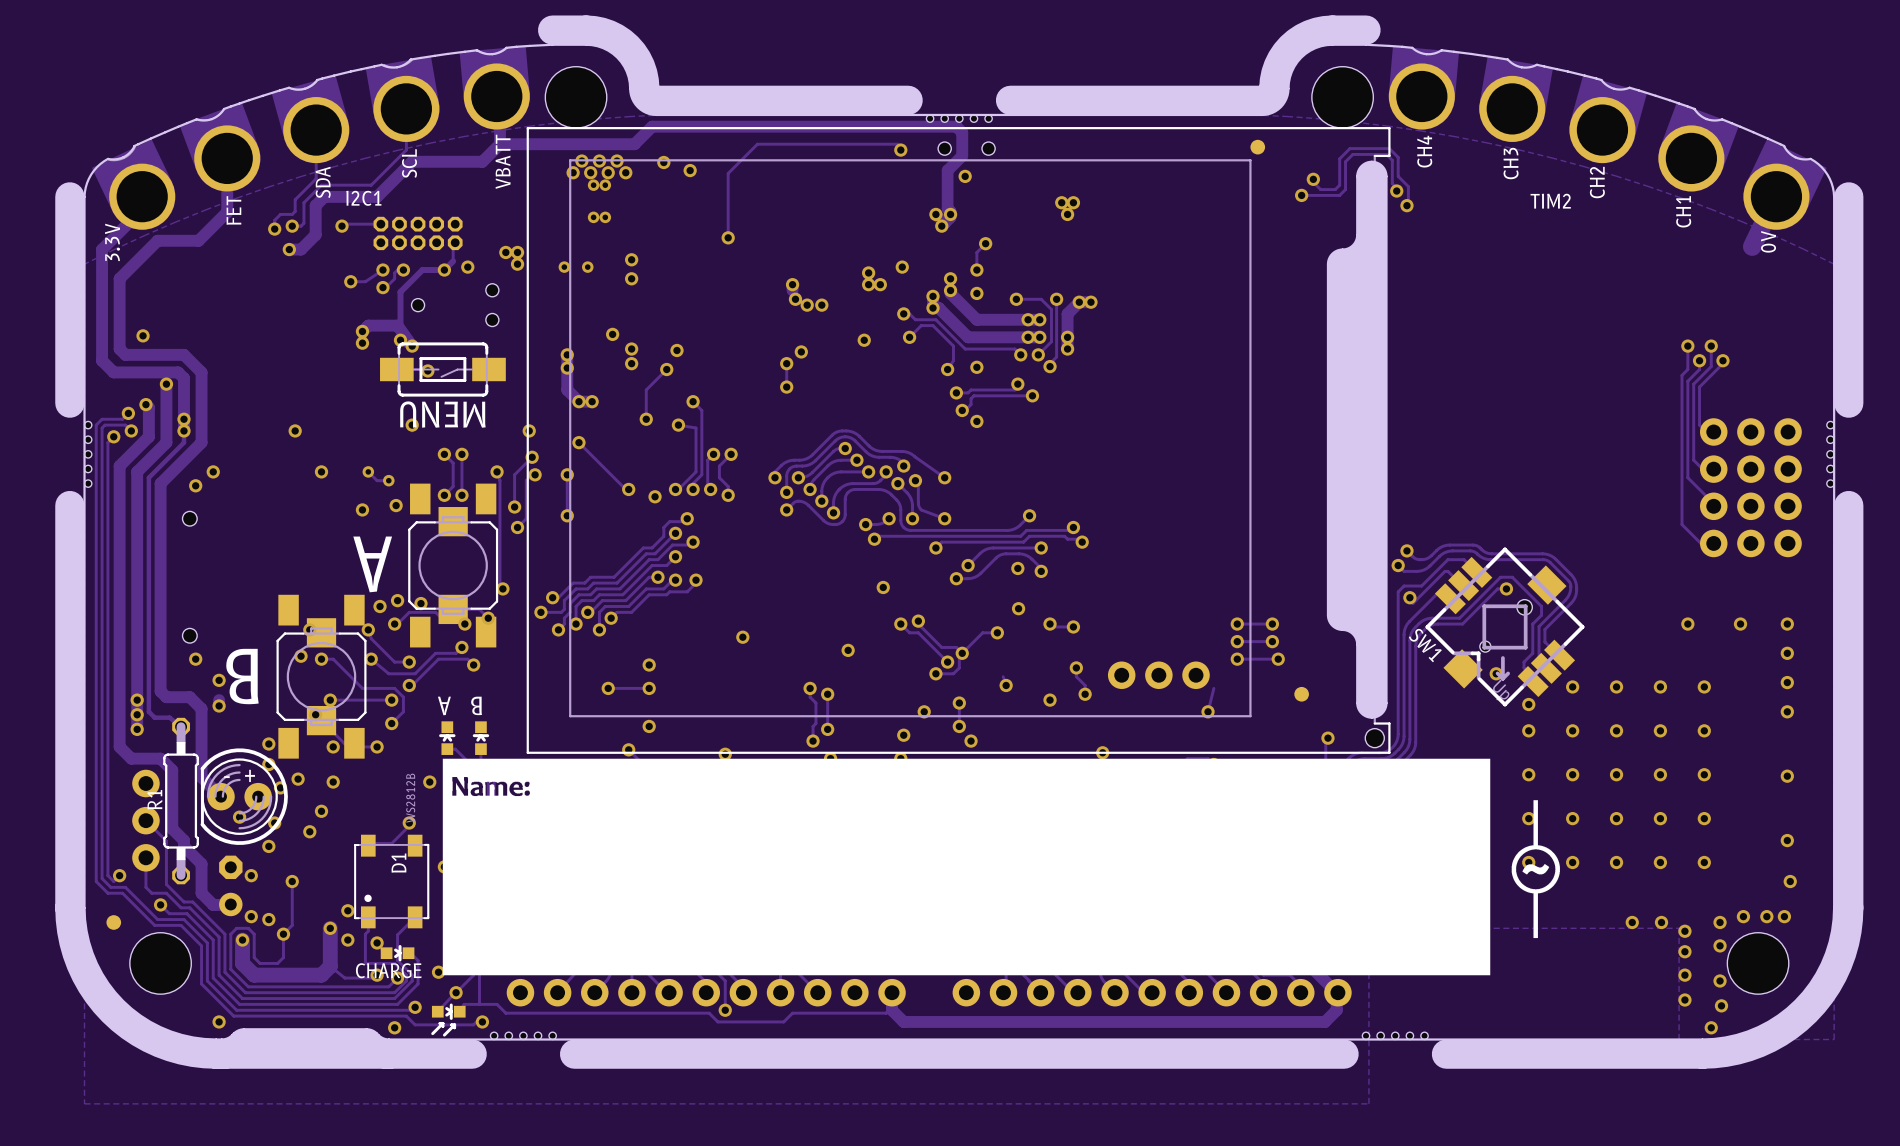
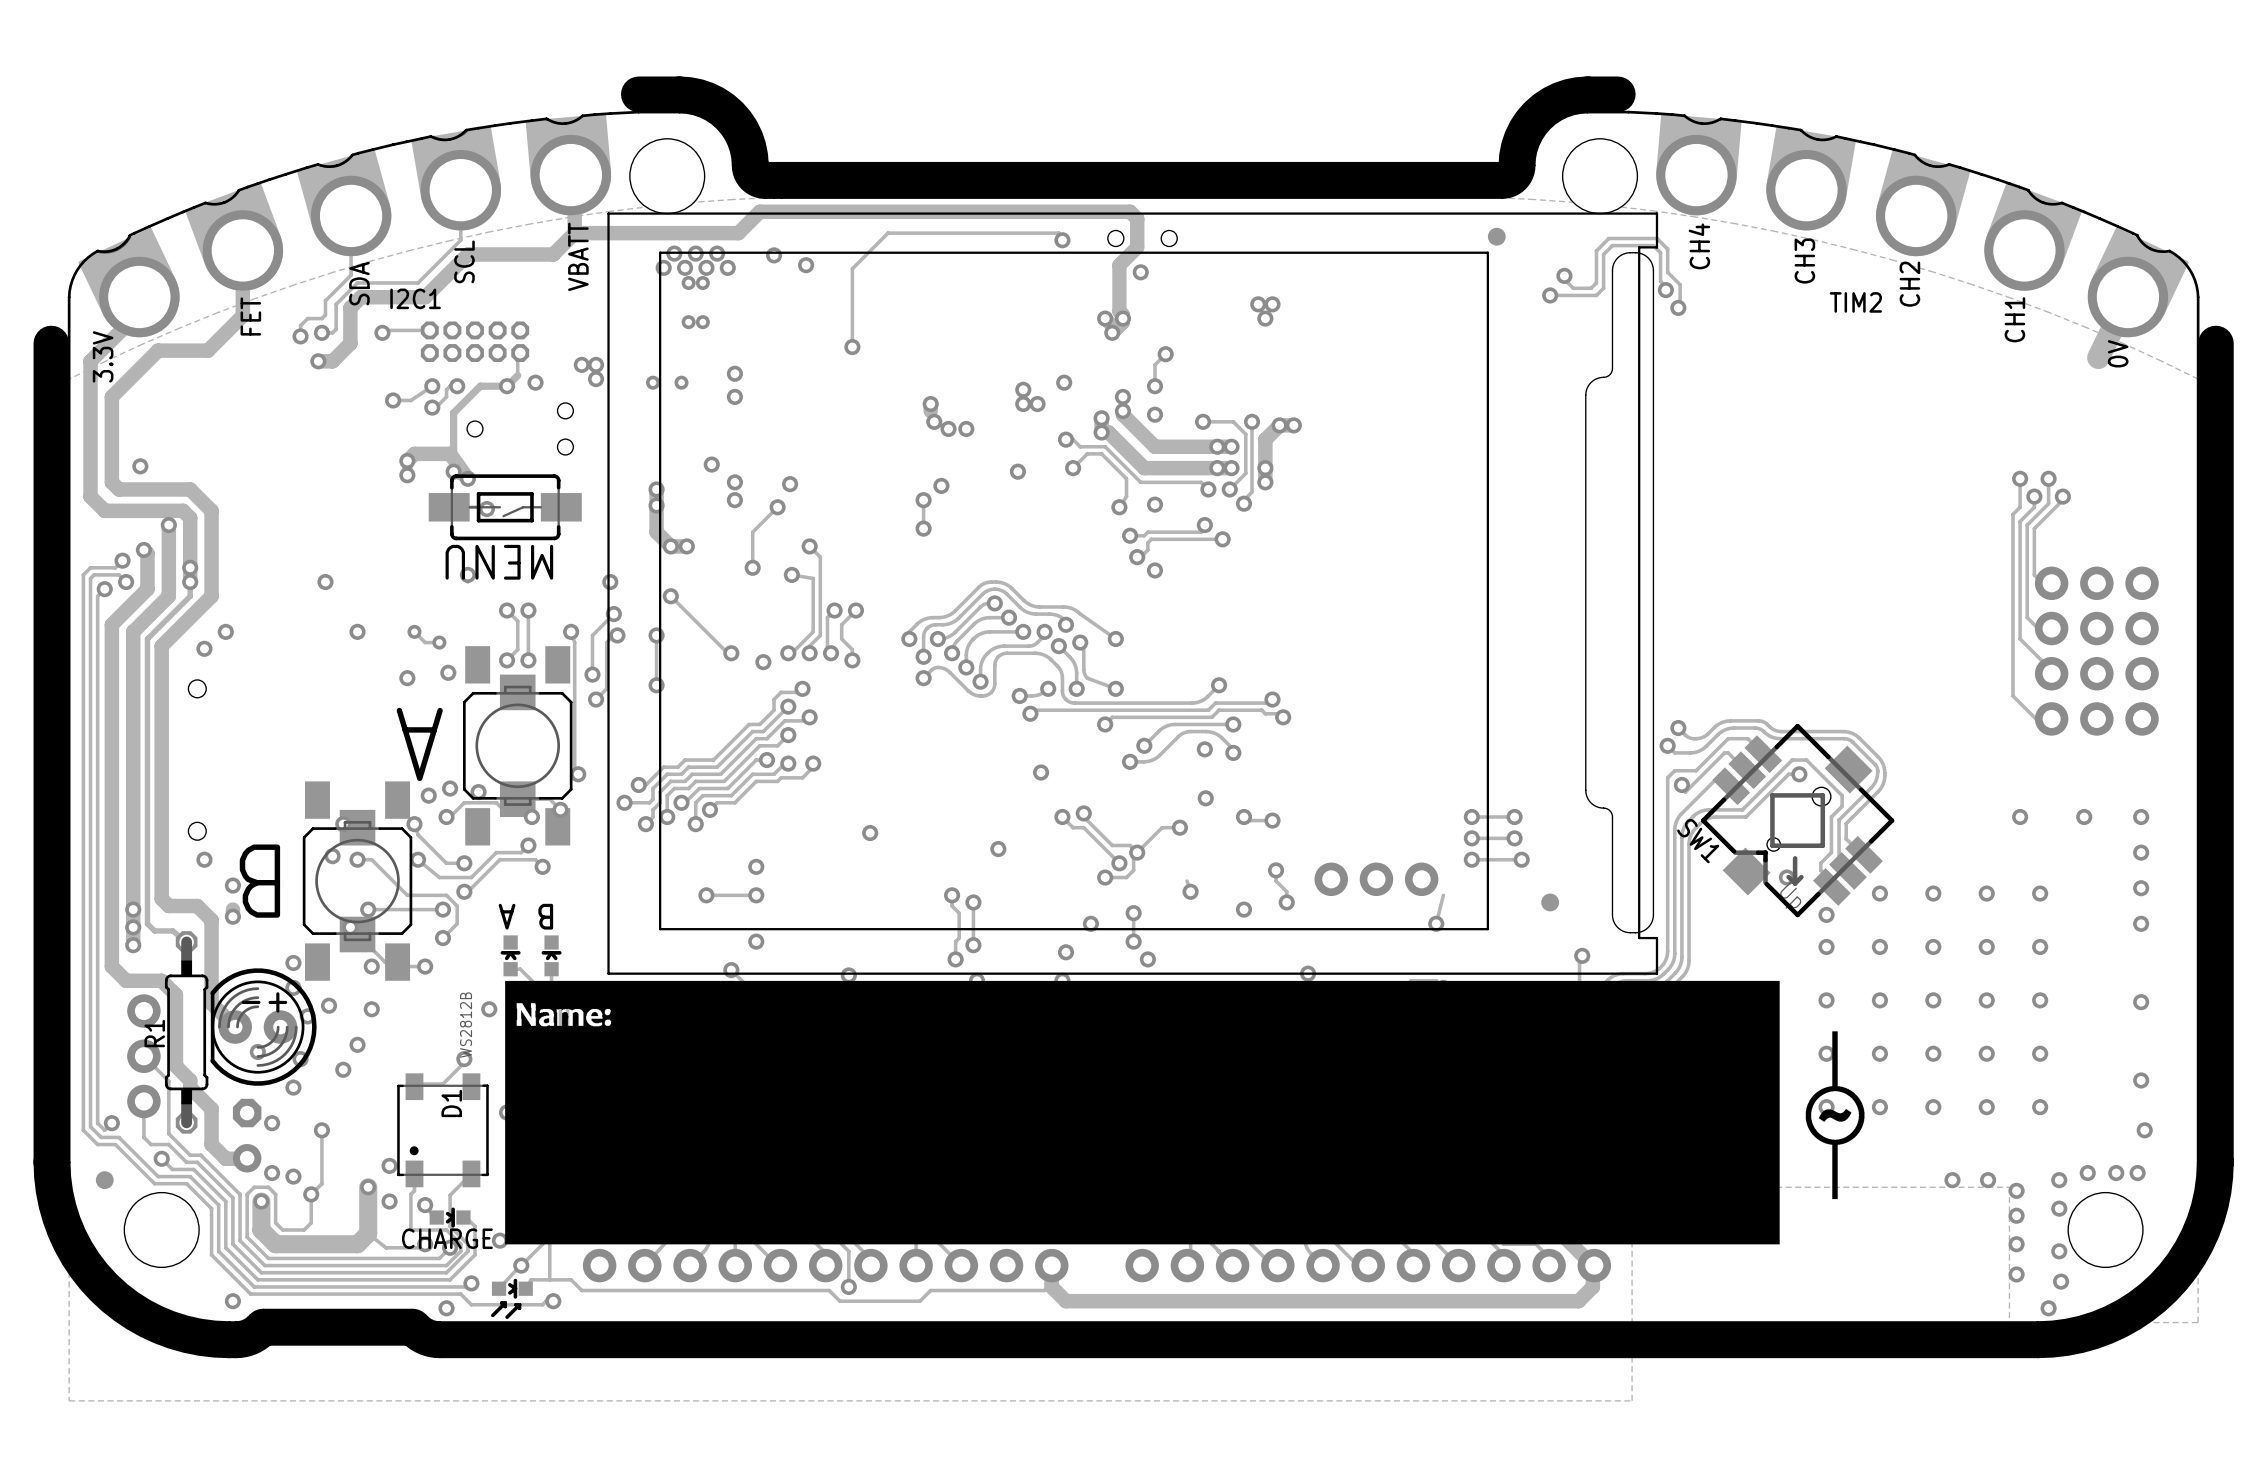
part footprint: [55, 15, 1864, 1069] -> [33, 76, 2234, 1359]
drawing: none -> [607, 212, 1659, 975]
part: (958, 440) -> none

